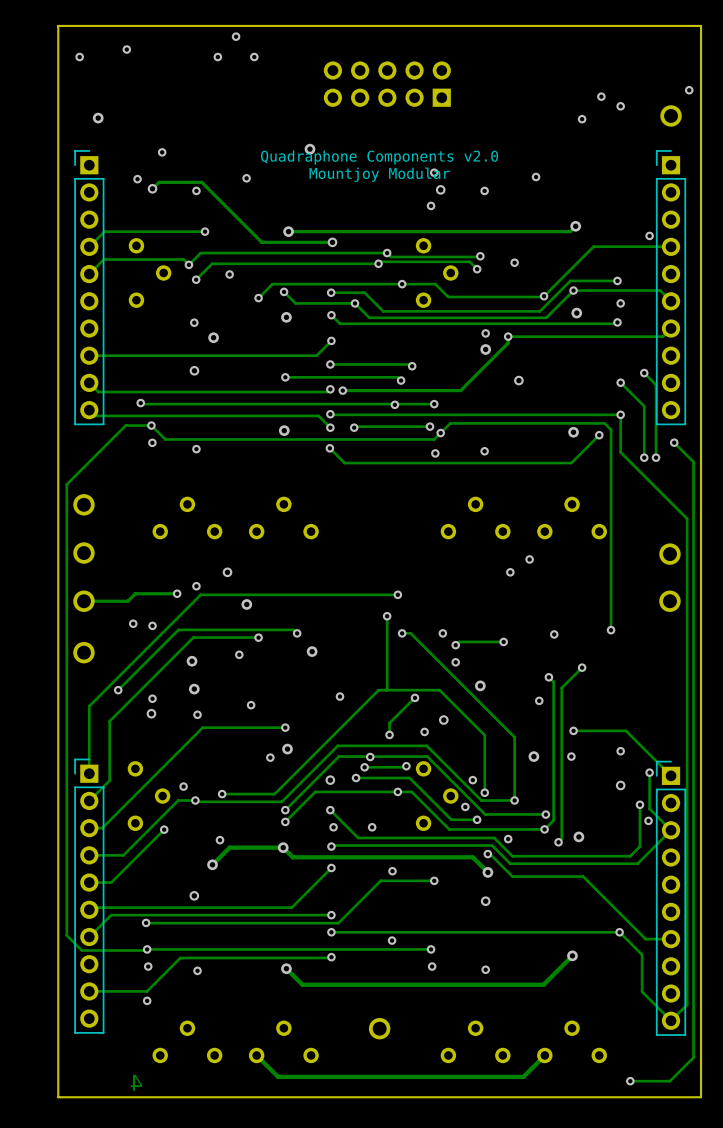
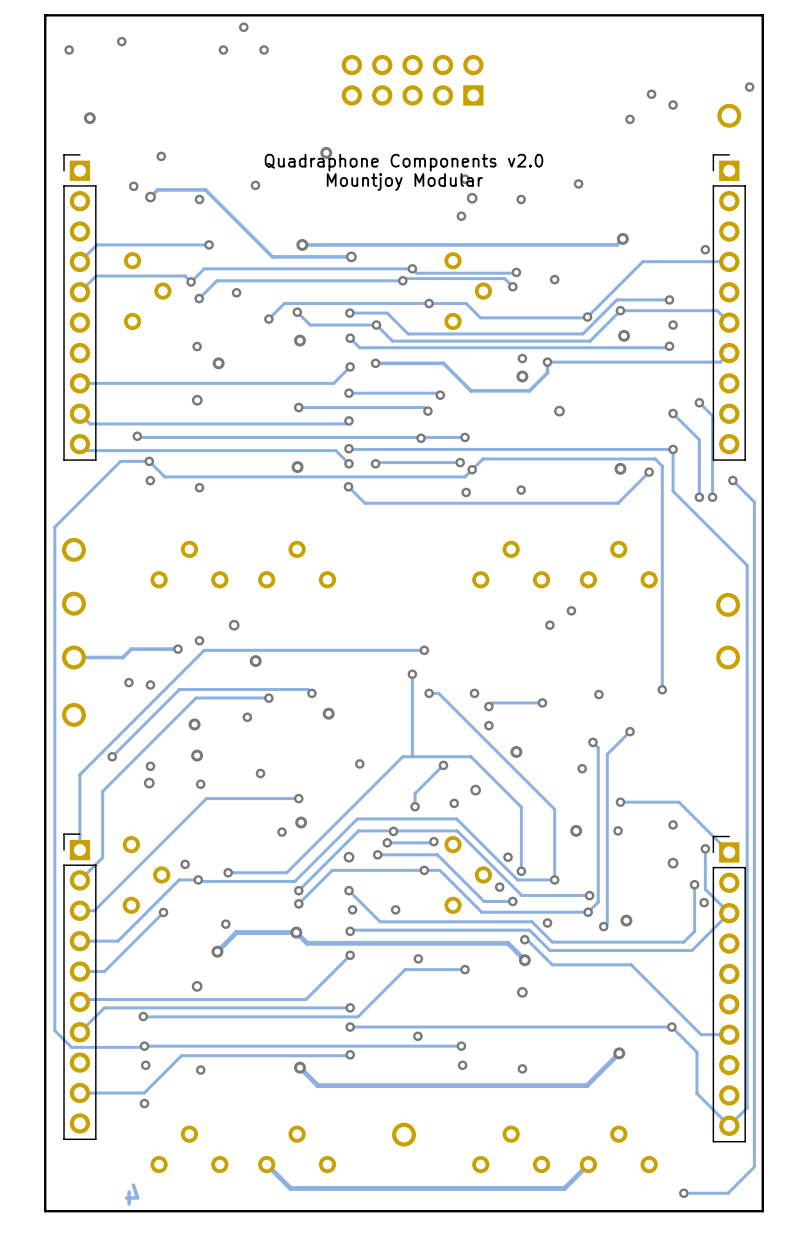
track: (508, 343) (460, 390) (342, 390) -> (547, 369) (547, 372) (529, 390) (470, 390) (443, 363) (375, 363)
via position: (342, 390) -> (375, 363)

